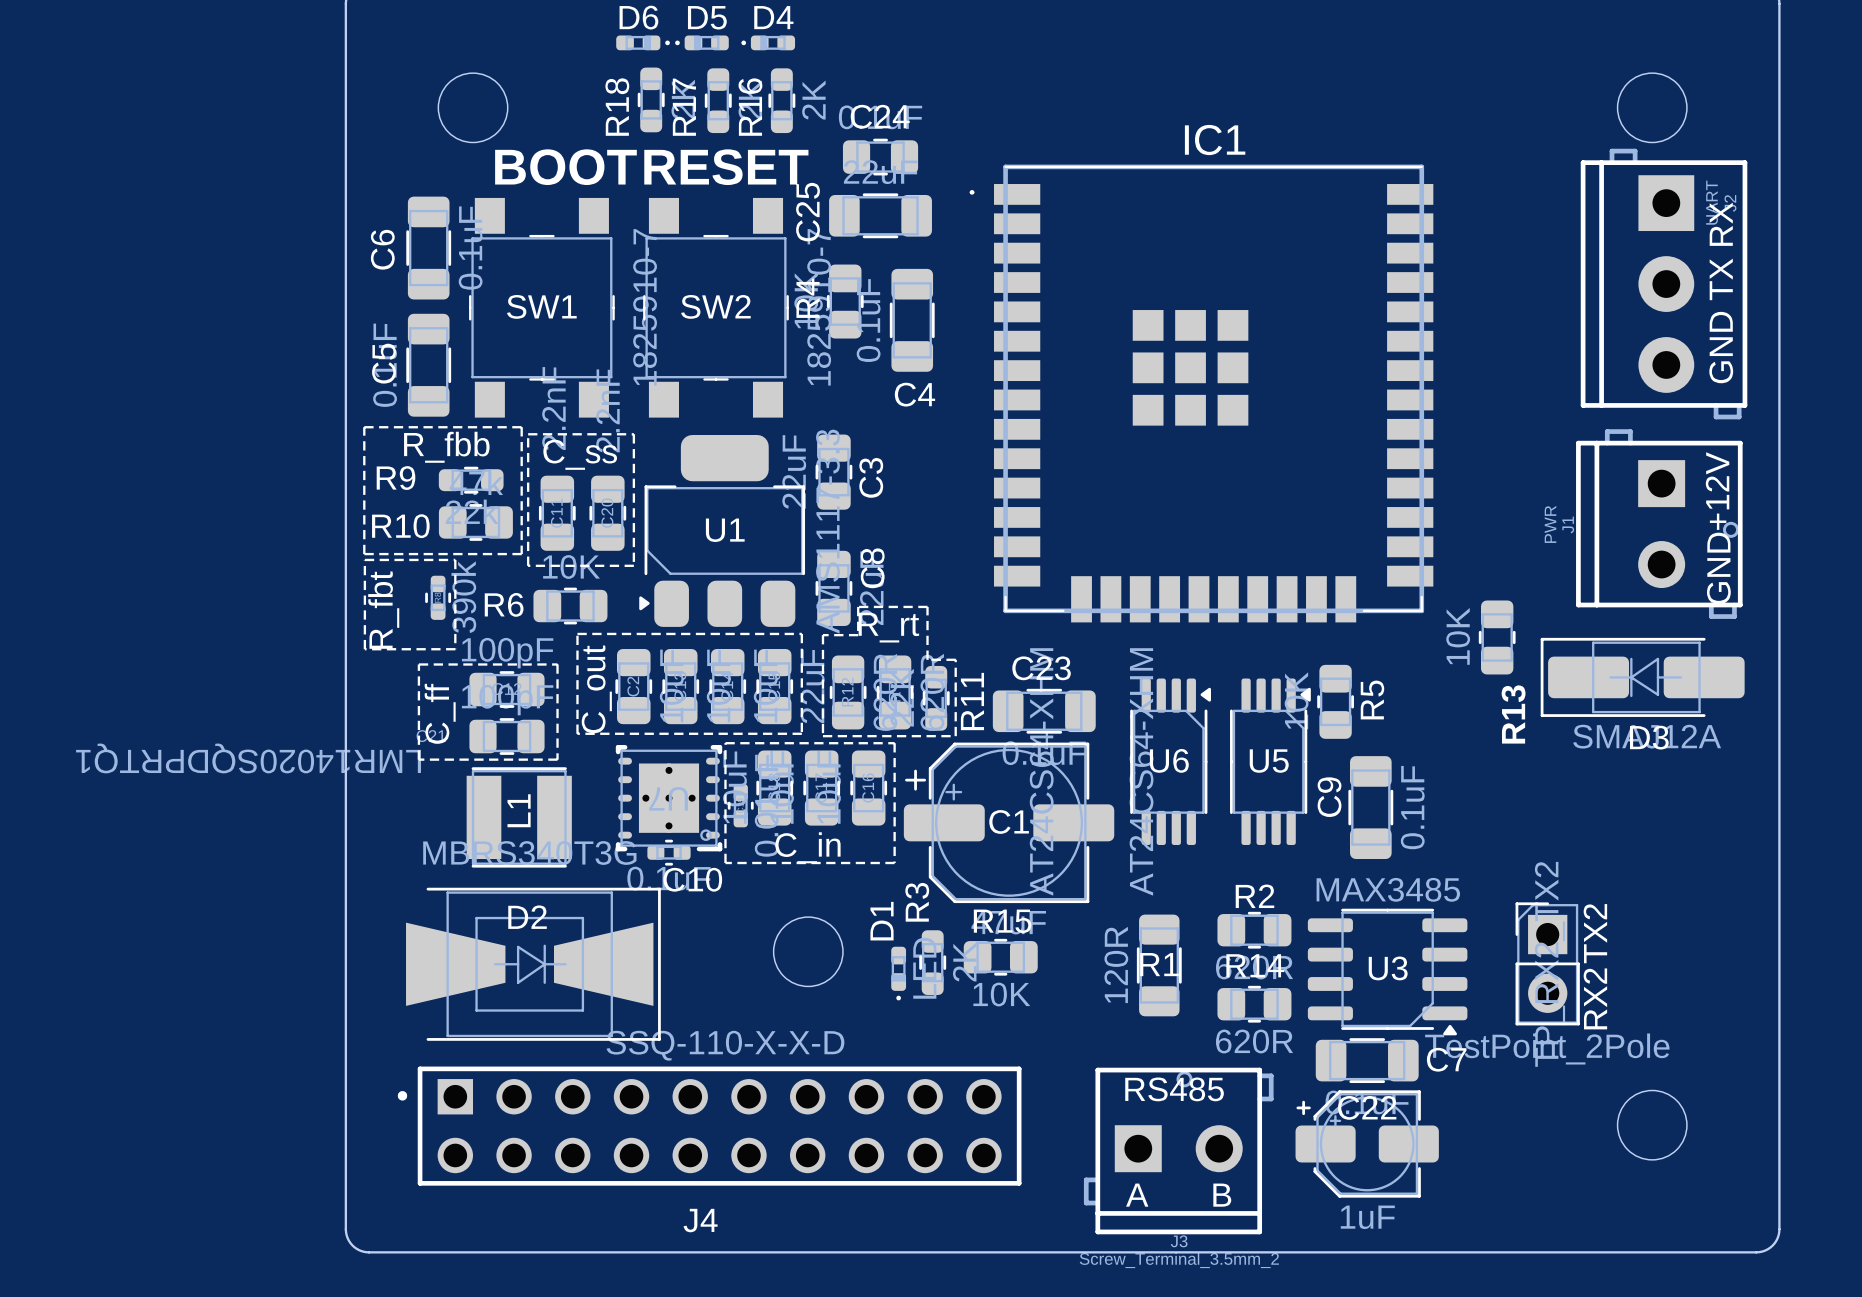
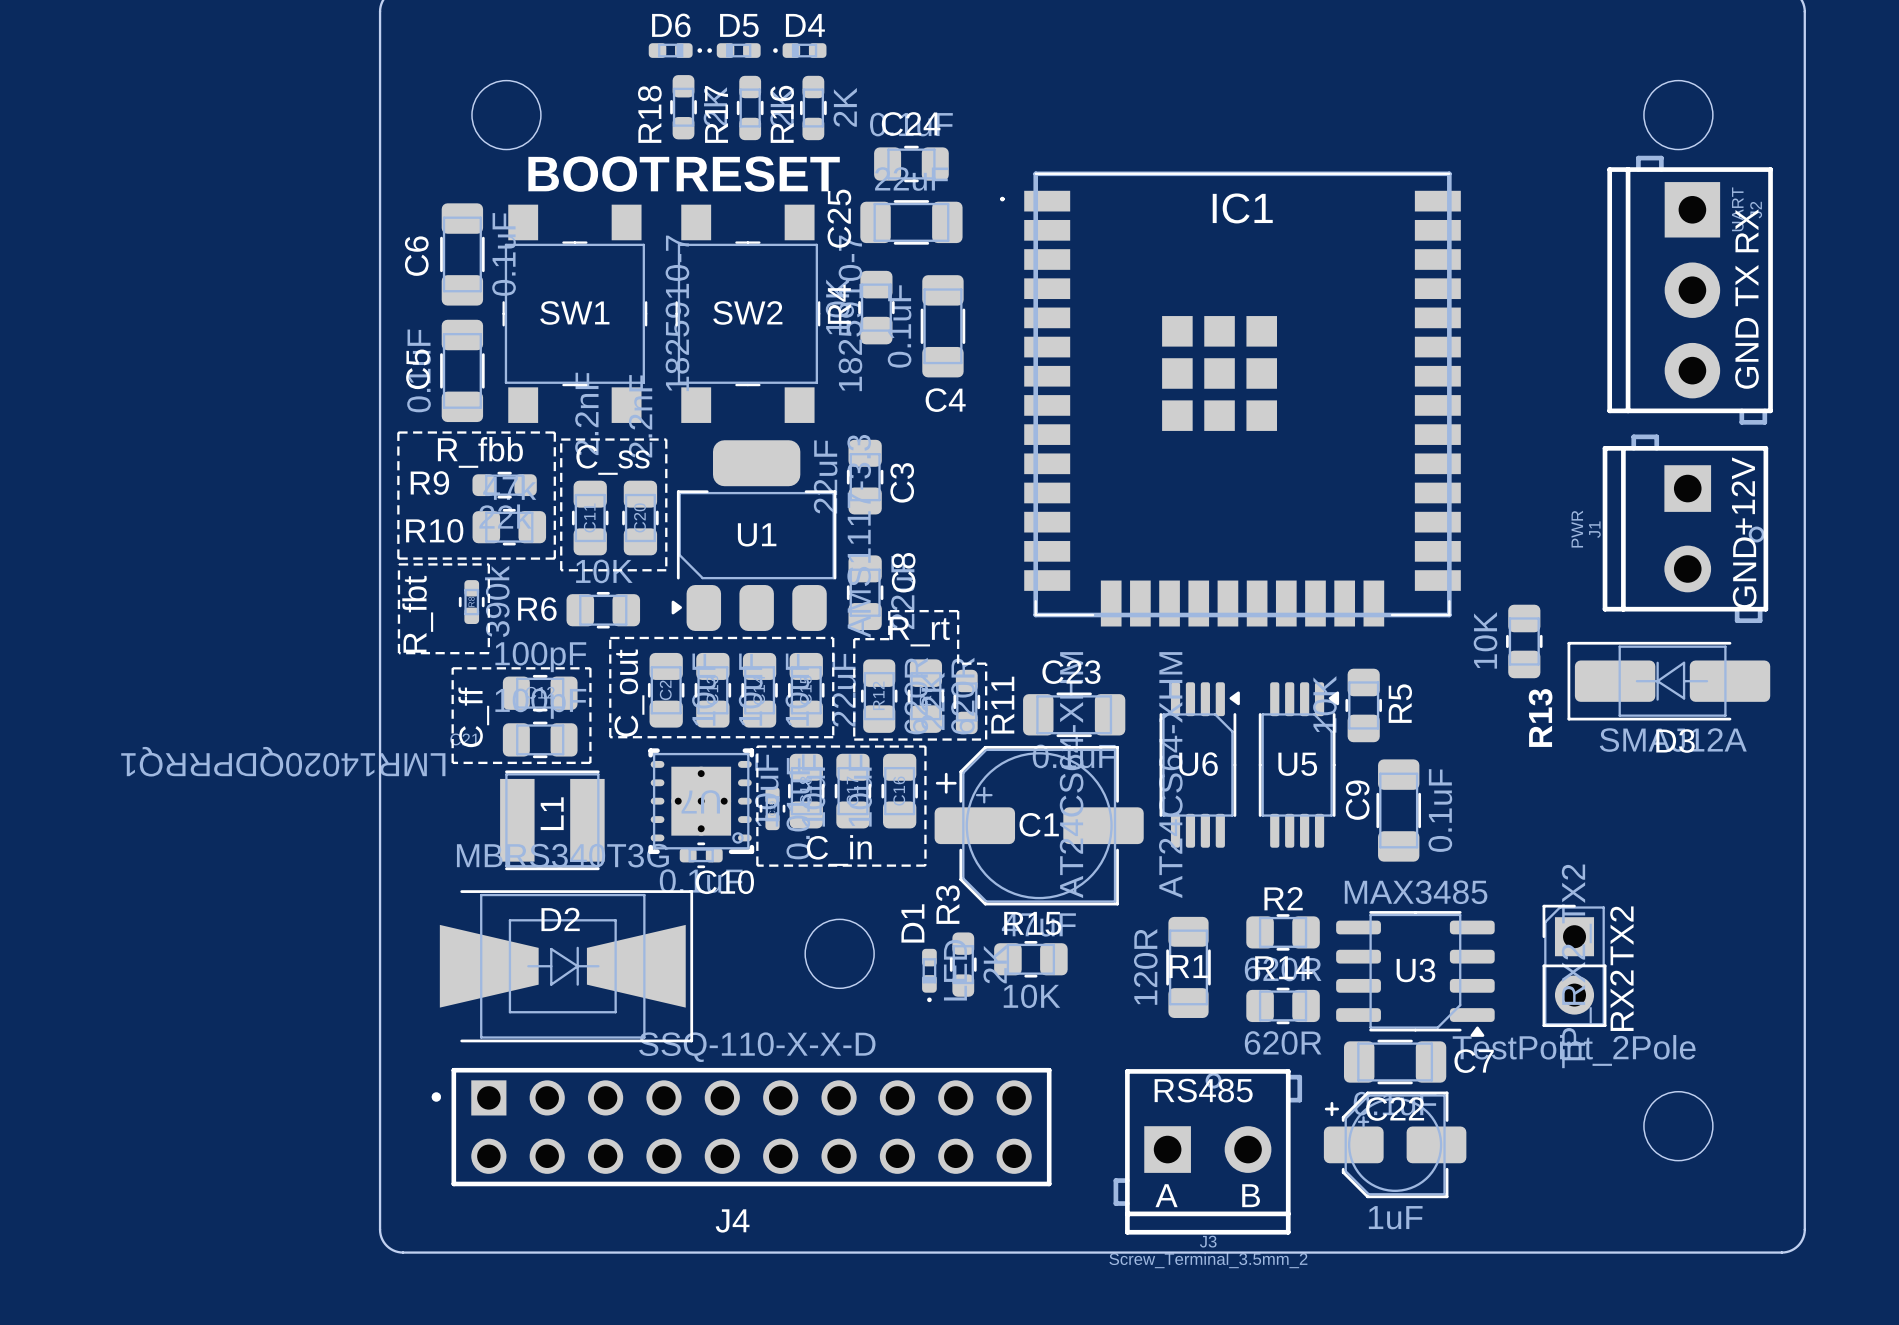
IC1 name position: IC1 (1215, 140) -> IC1 (1242, 208)
part value: LMR14020SQDPRTQ1 (248, 758) -> LMR14020QDPRRQ1 (283, 761)

